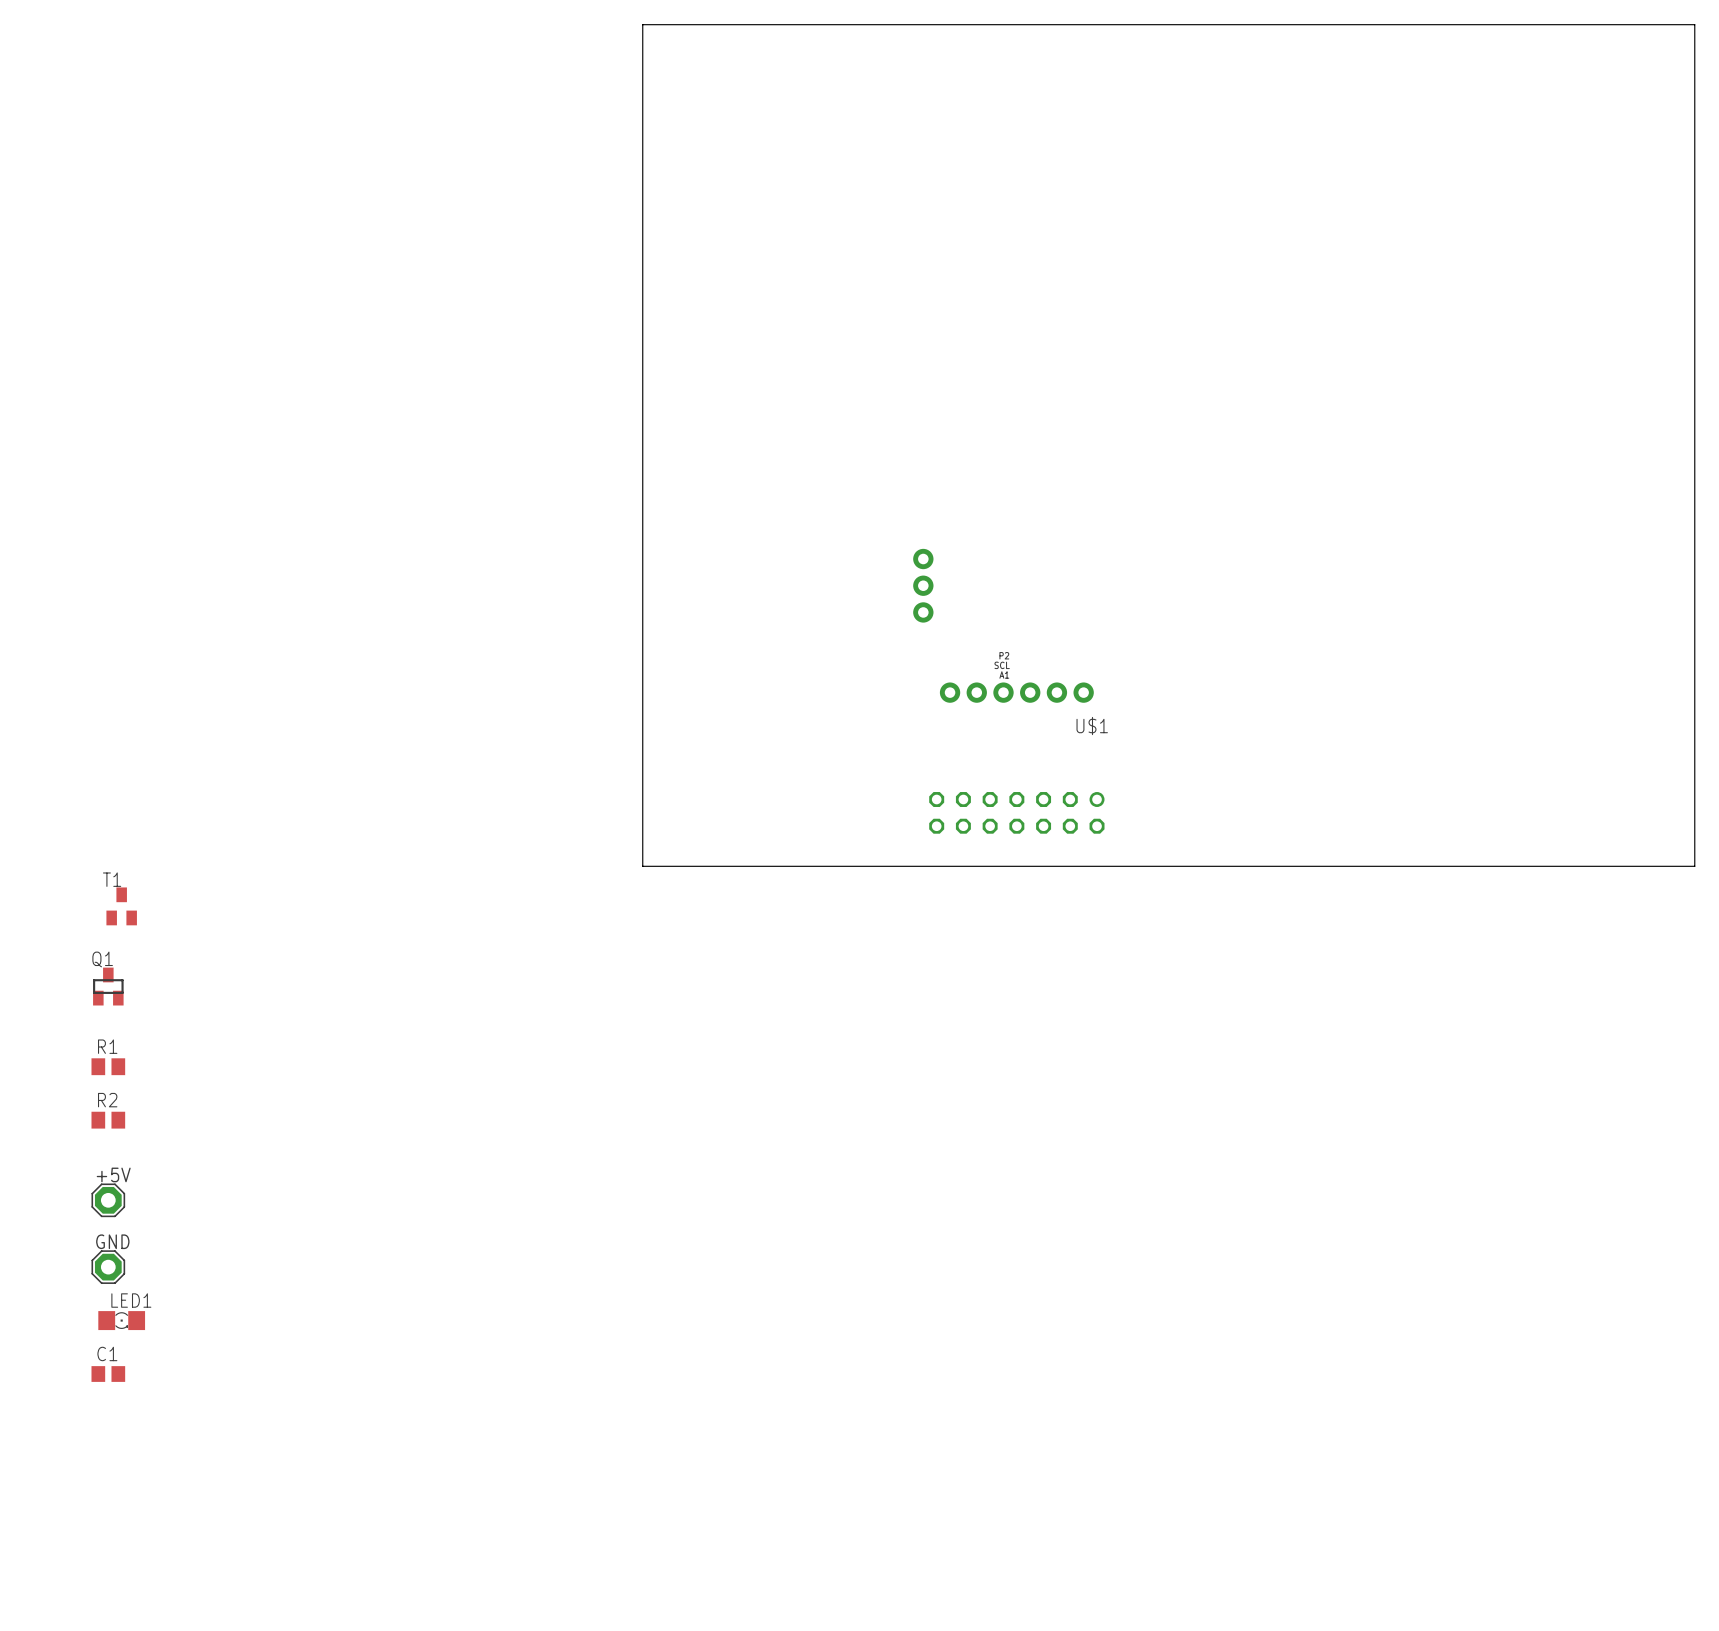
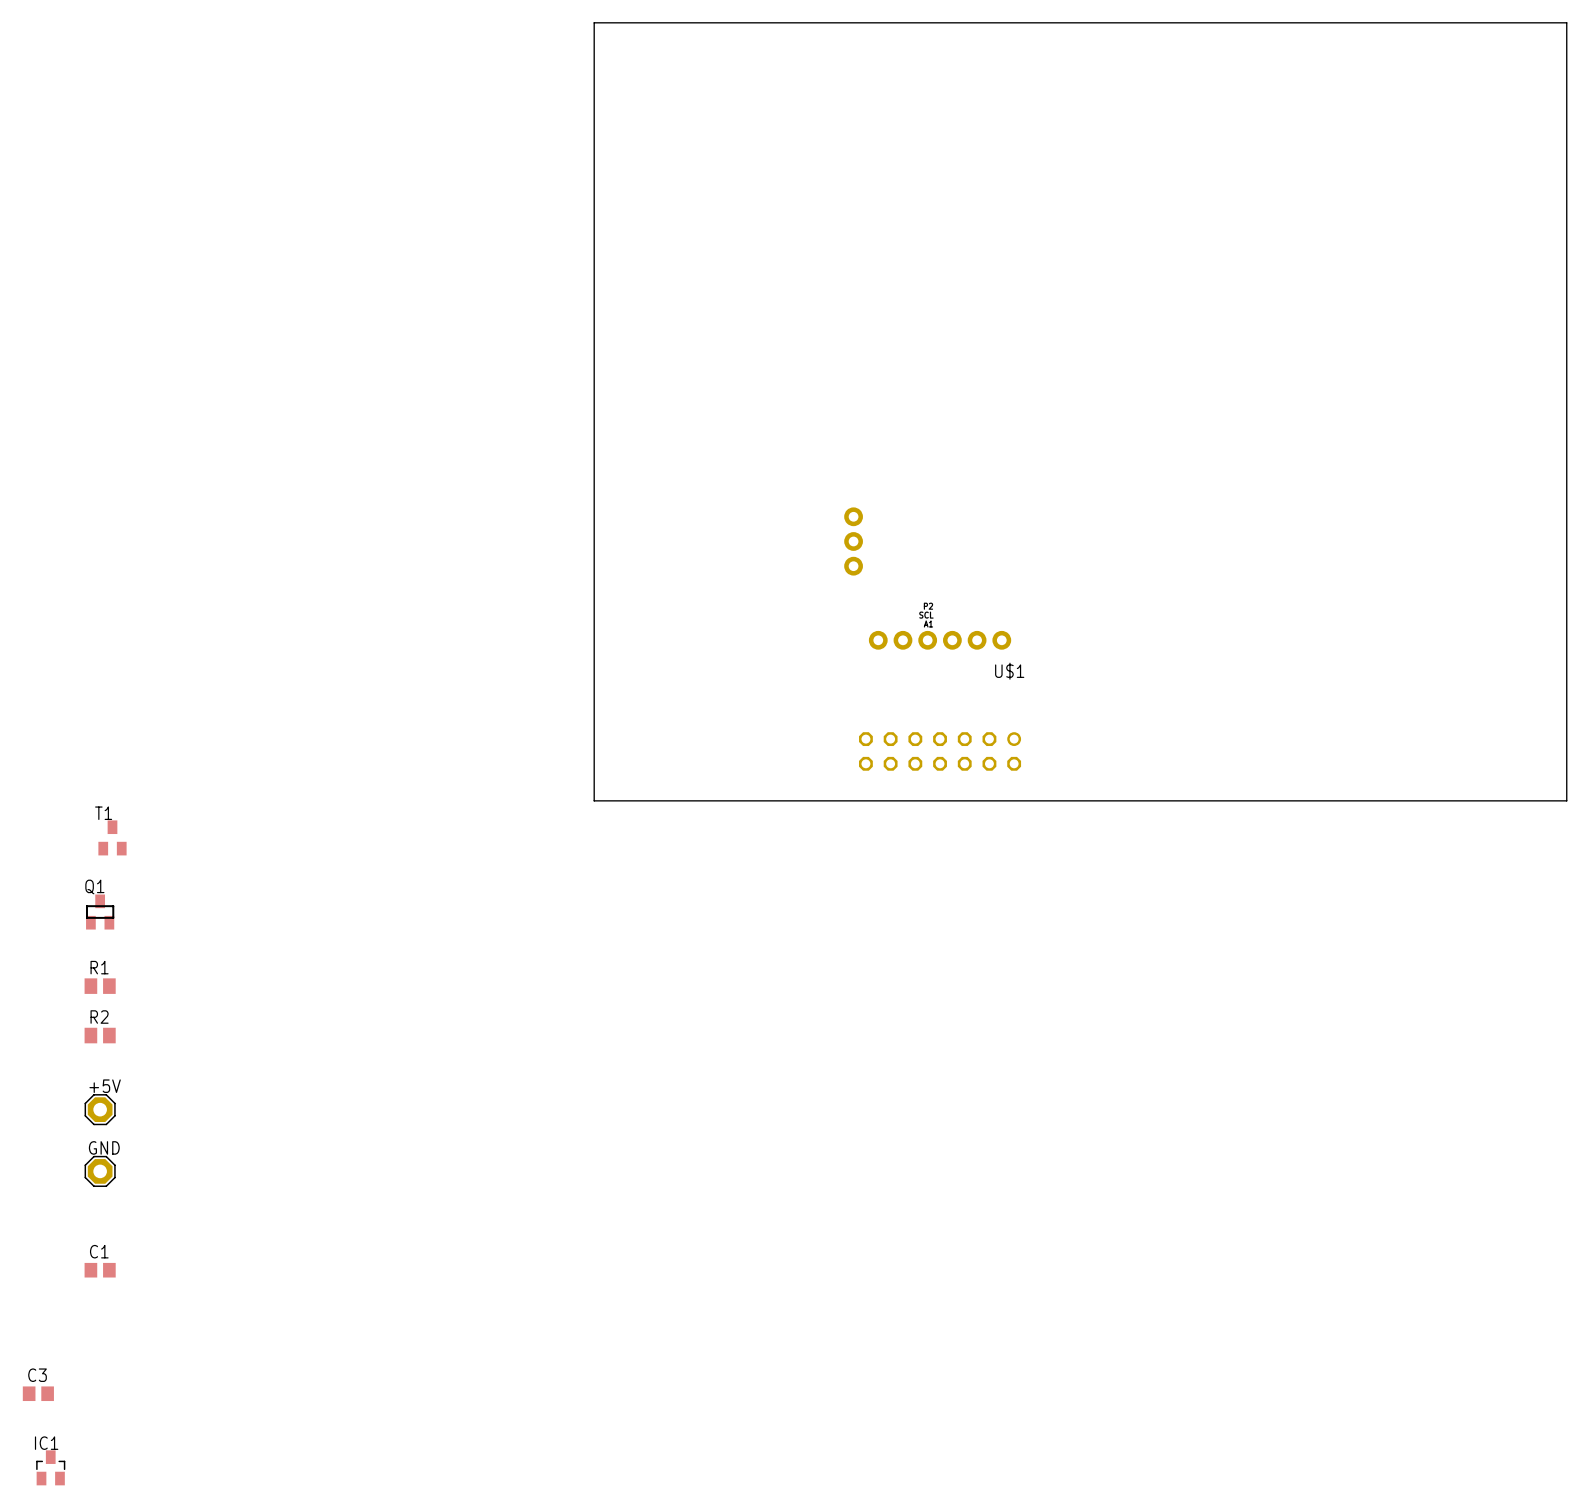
LED1: (121, 1320) -> none
C3: none -> (38, 1393)
IC1: none -> (50, 1467)

